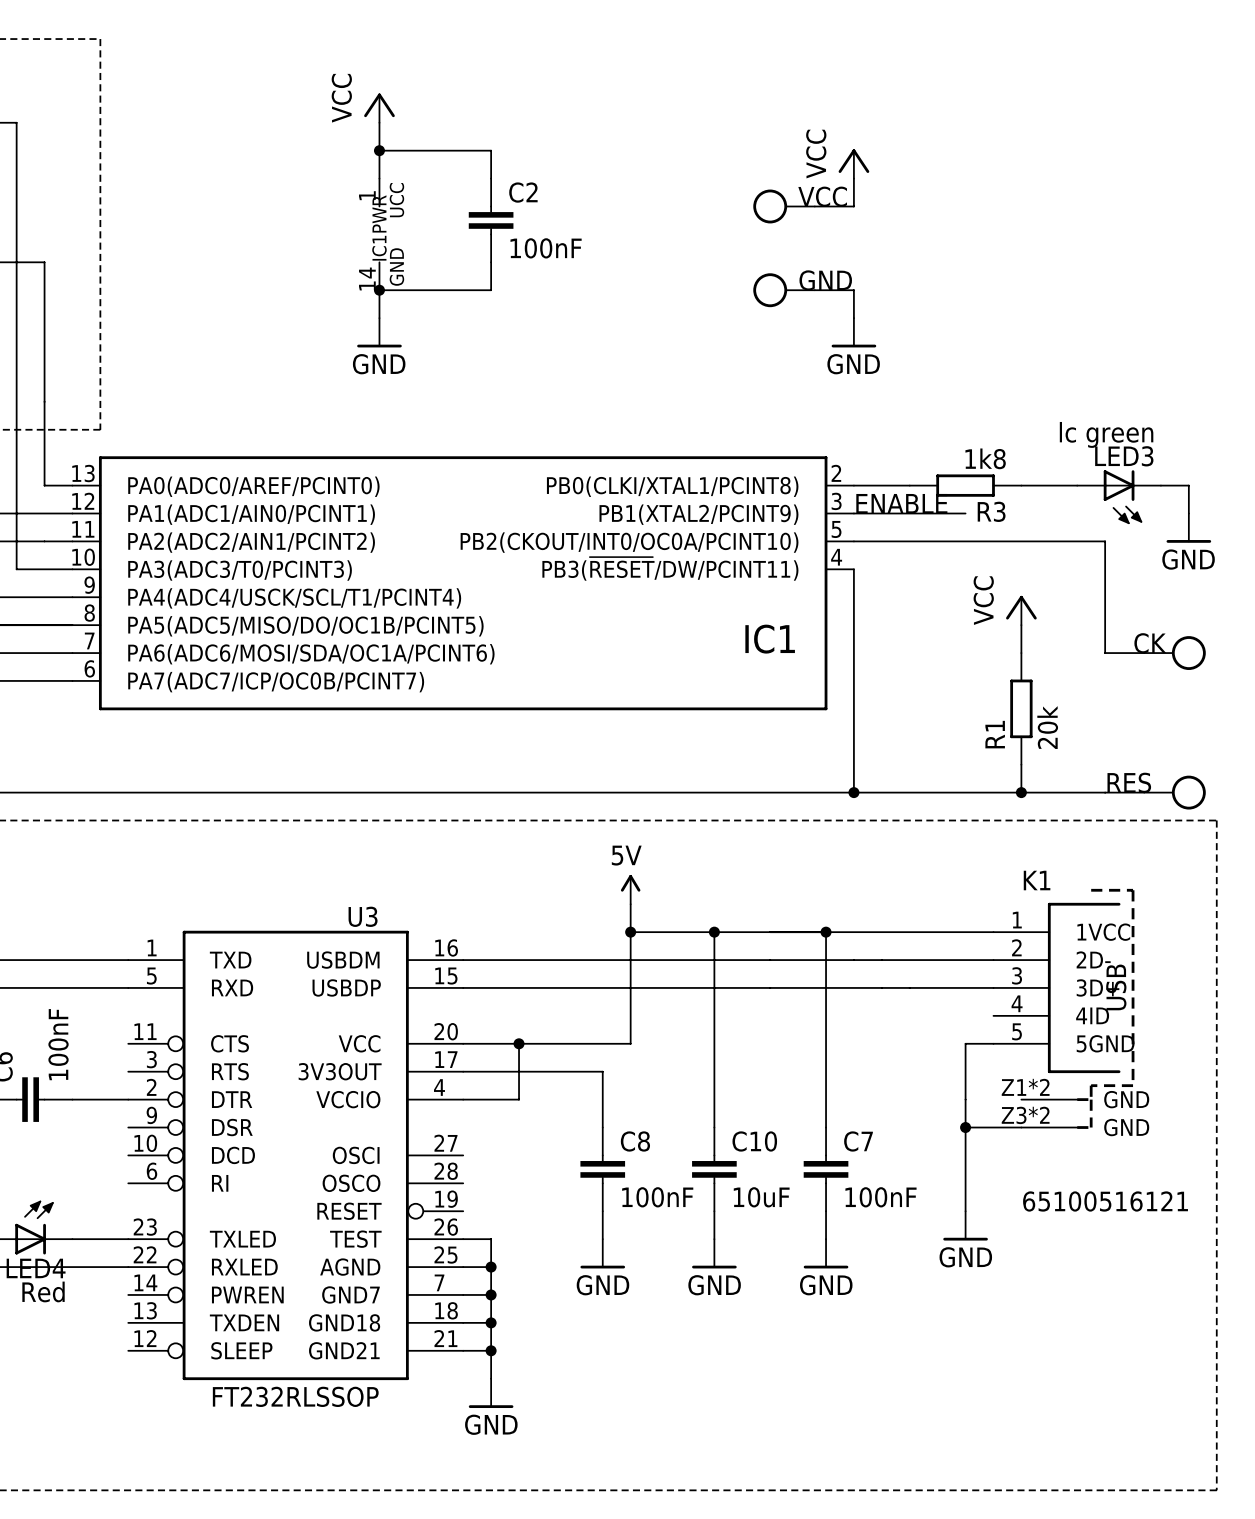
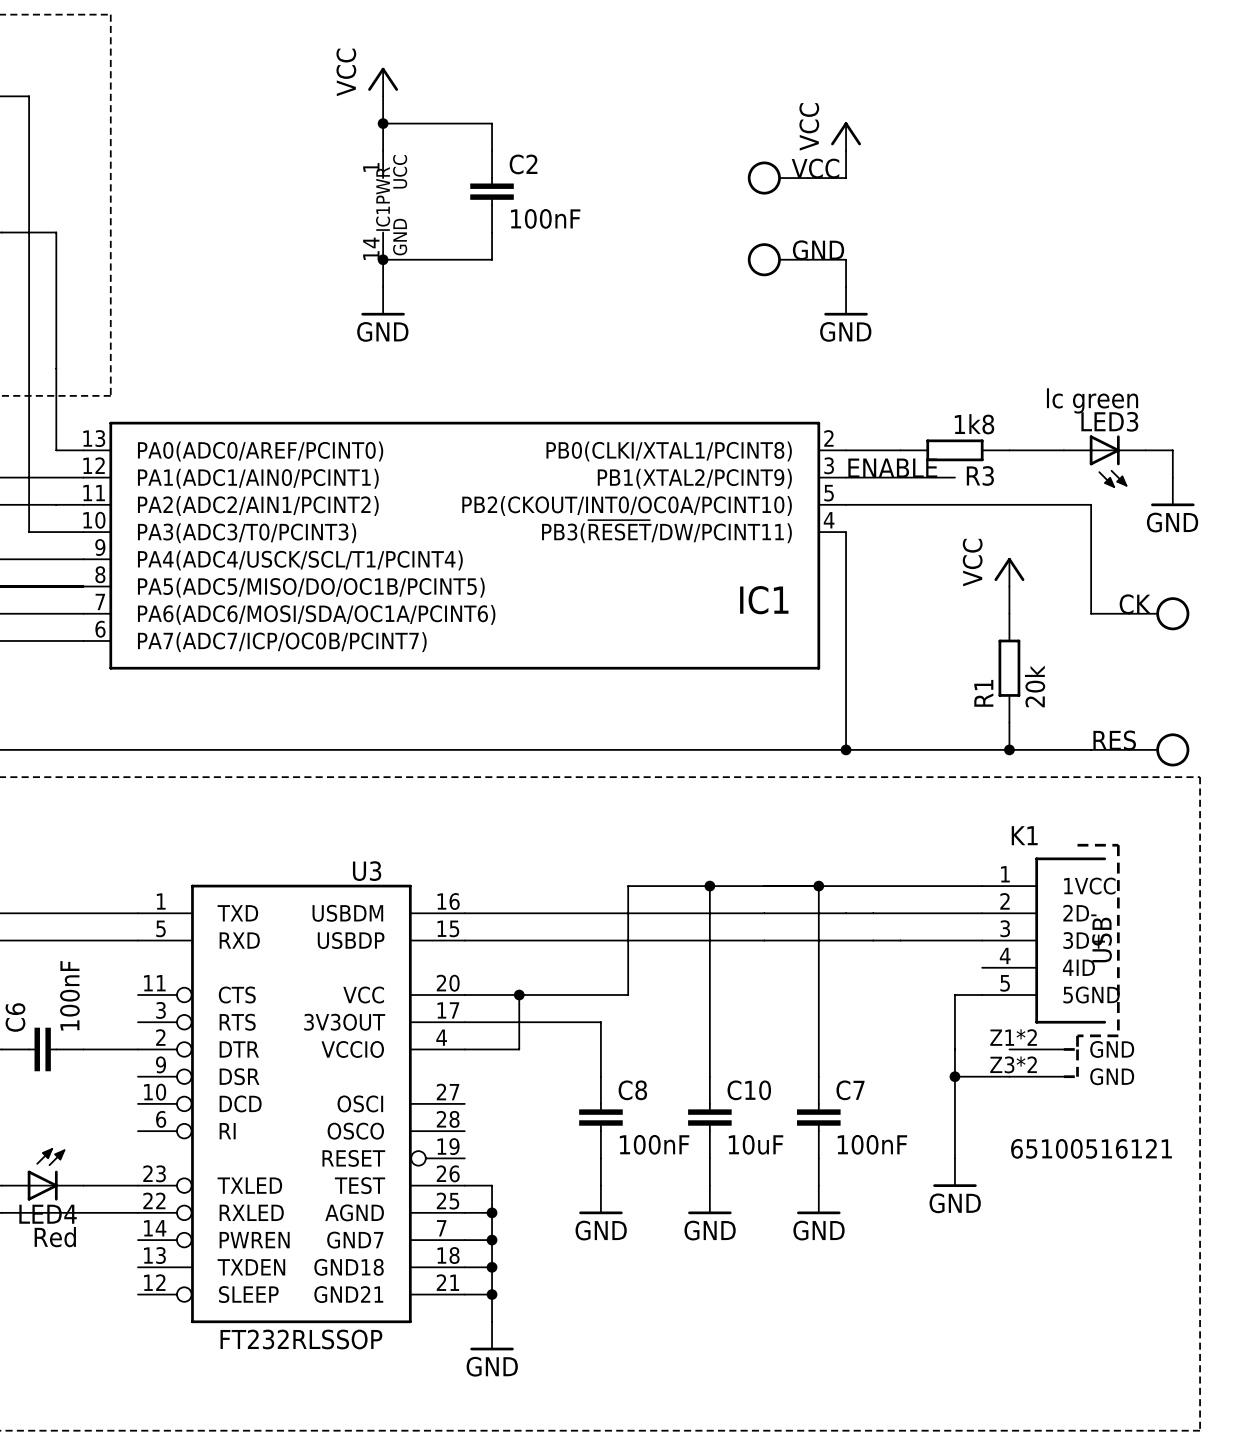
power symbol: 5V (630, 889) -> none
wire: (630, 904) (630, 932) -> none
junction: (630, 932) -> none

